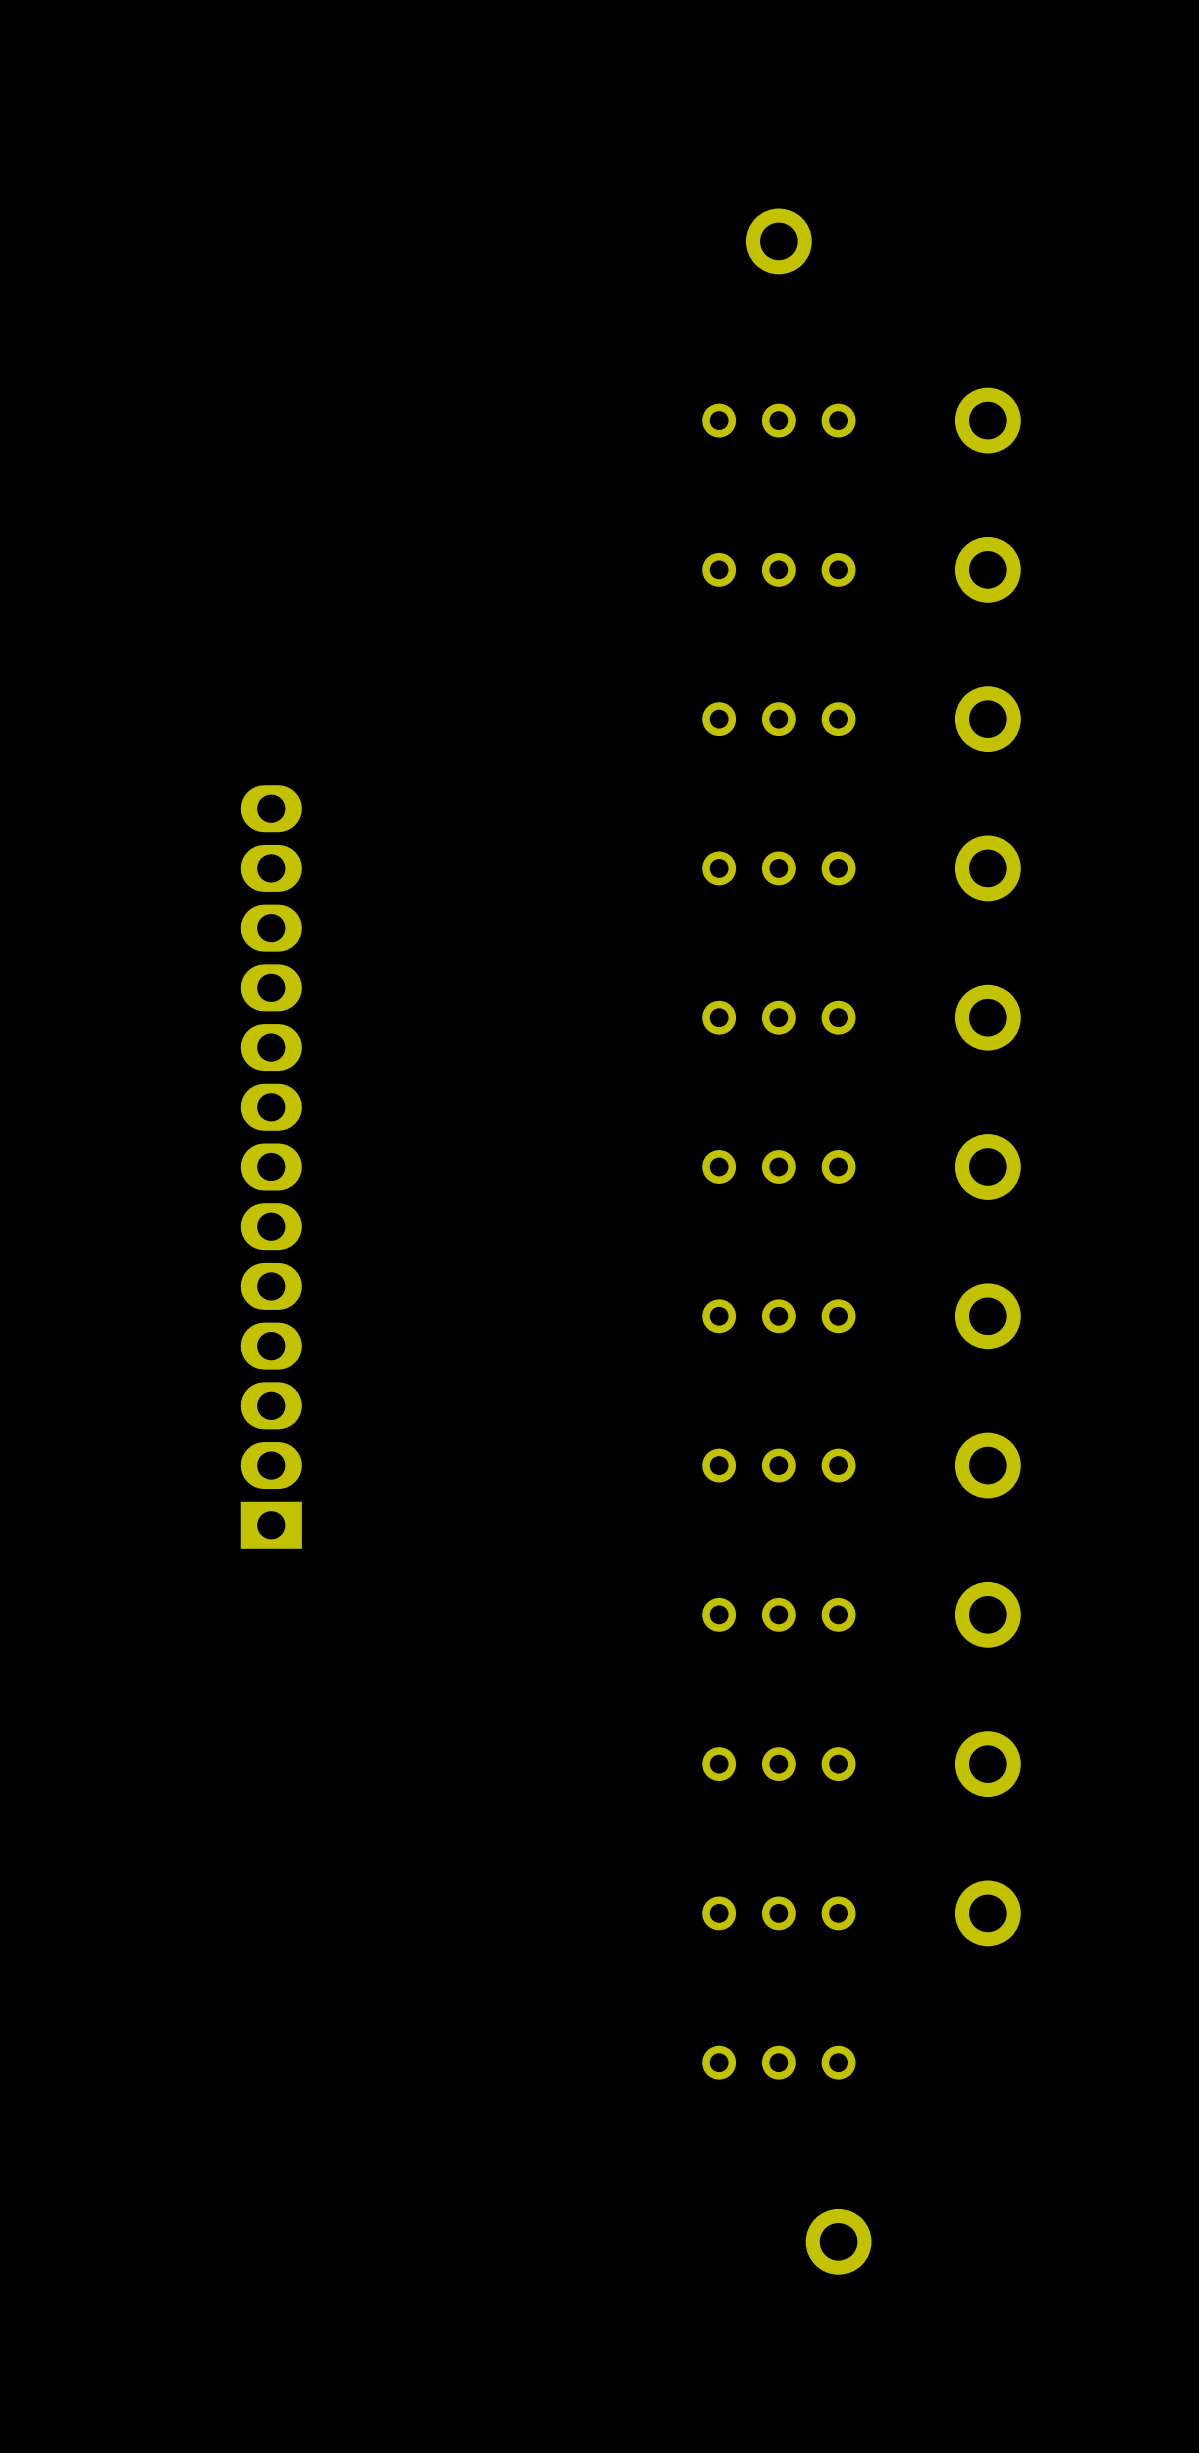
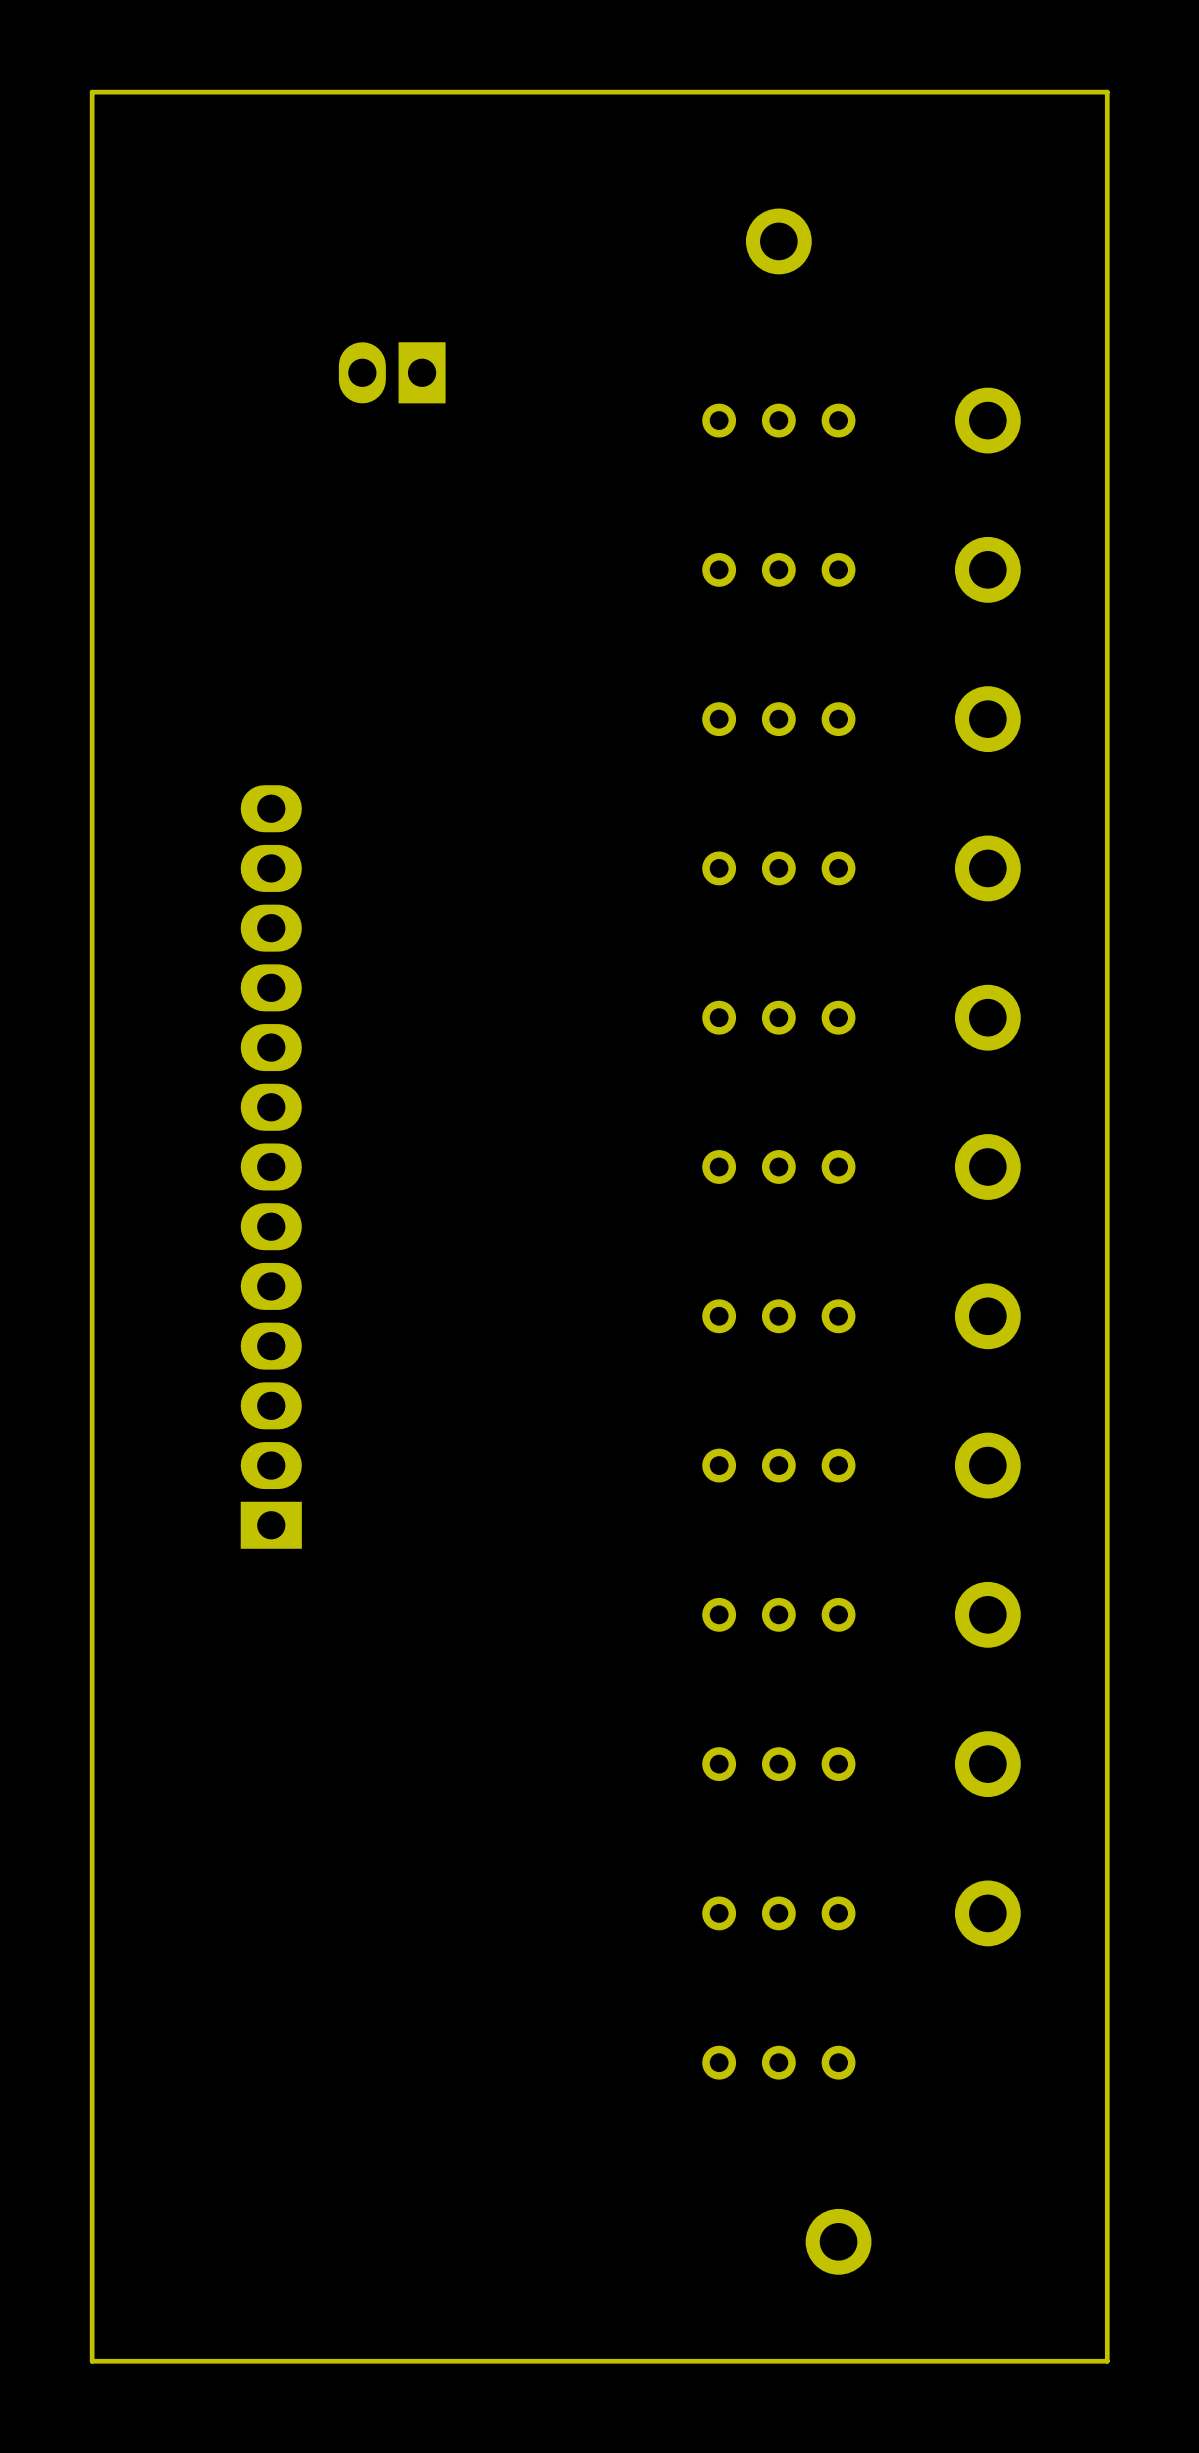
board edge: none -> (1107, 92) (92, 92) (92, 2361) (1107, 2361) (1107, 92)
part: none -> (392, 372)

